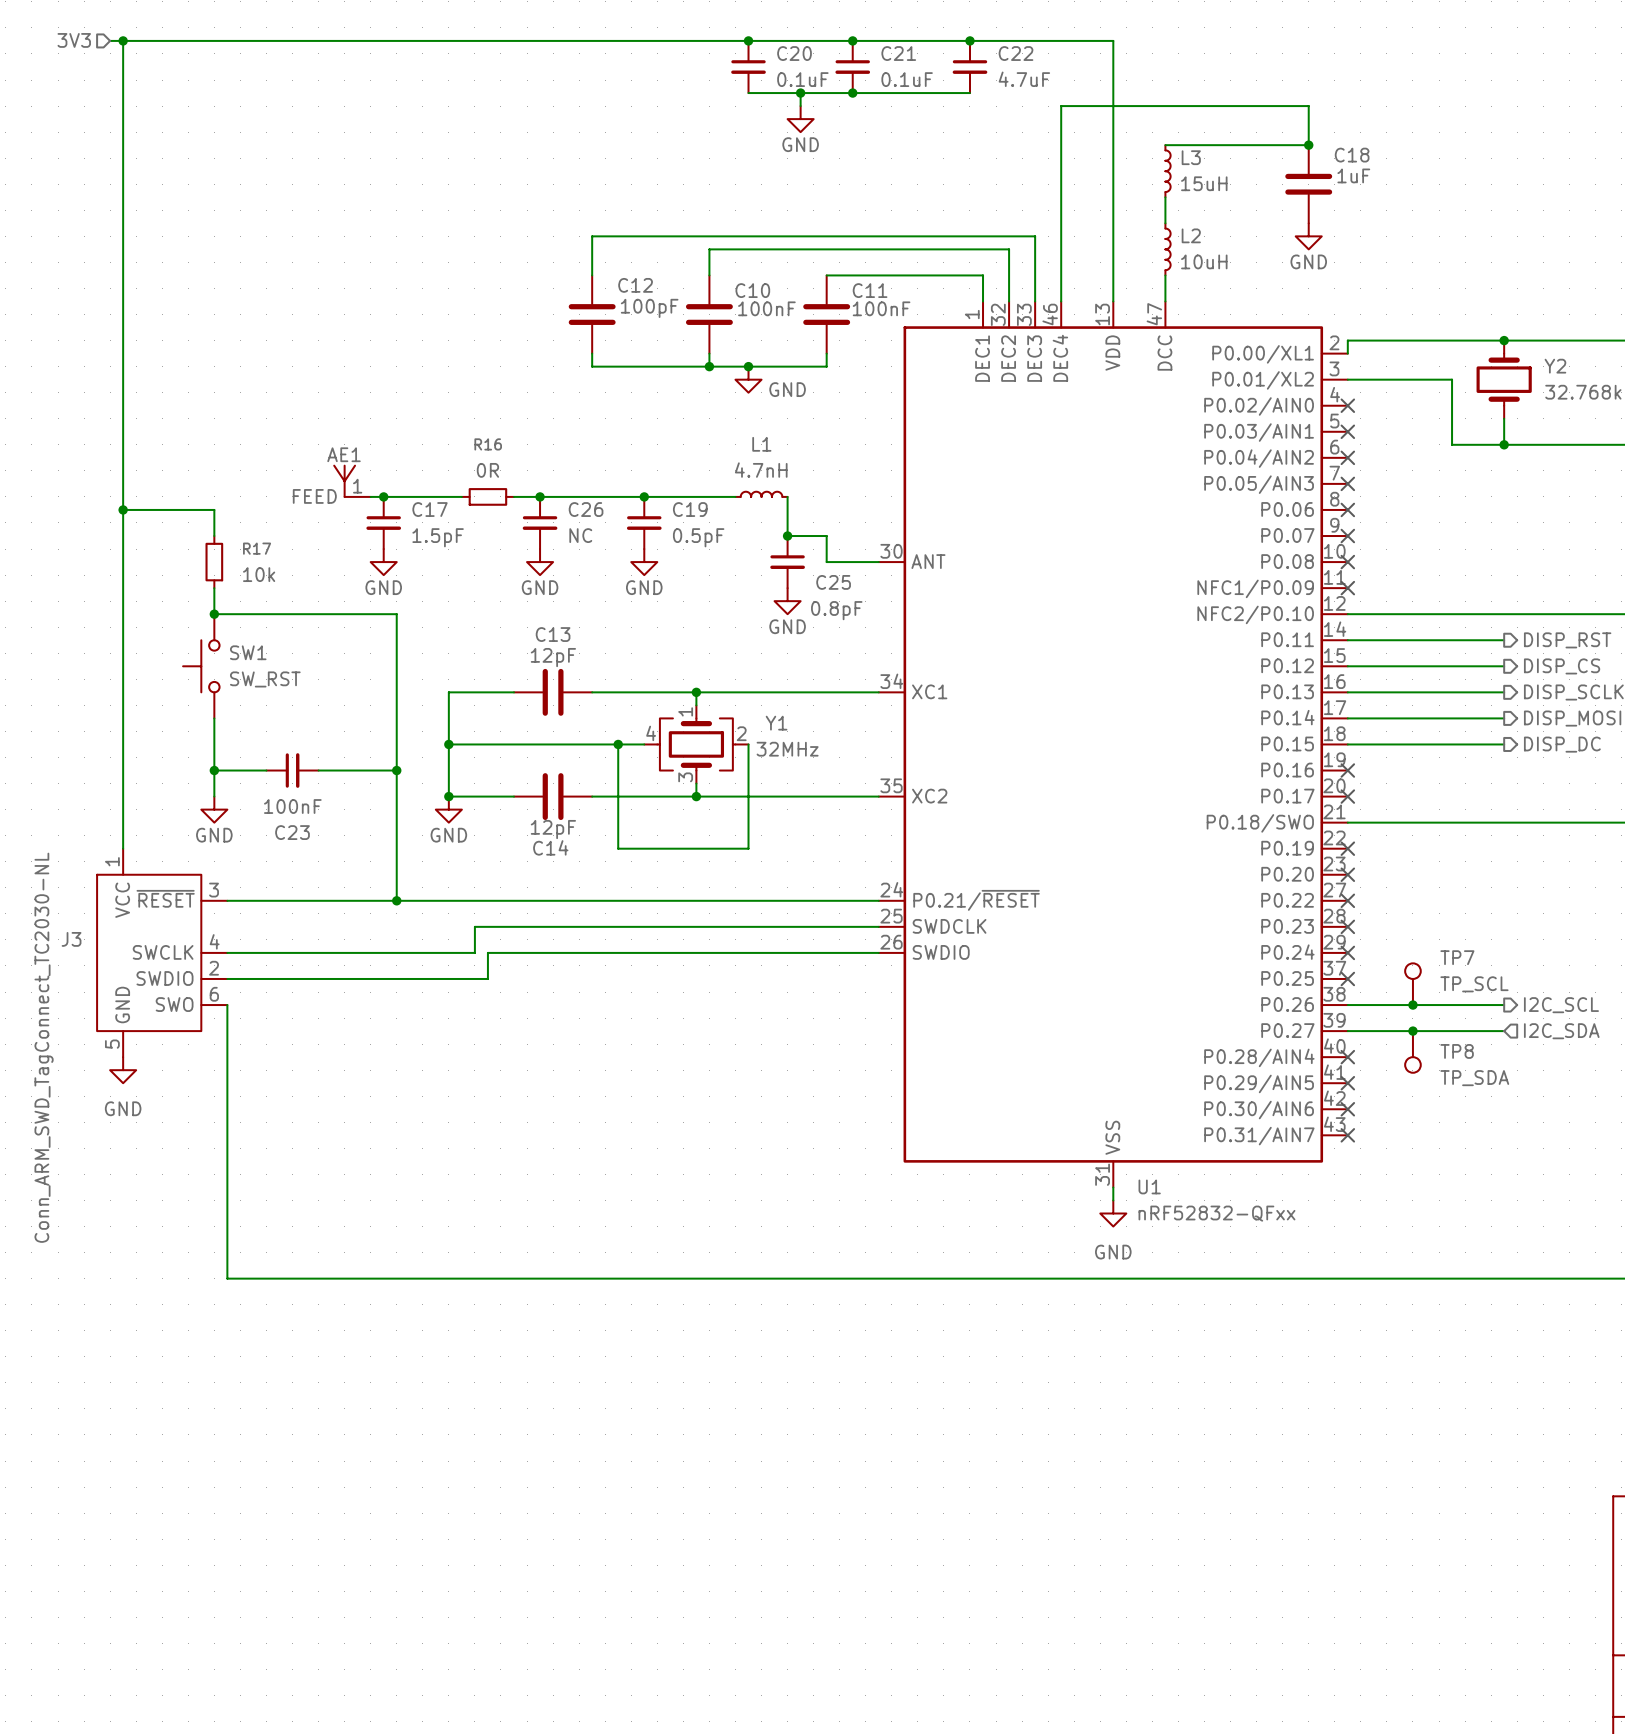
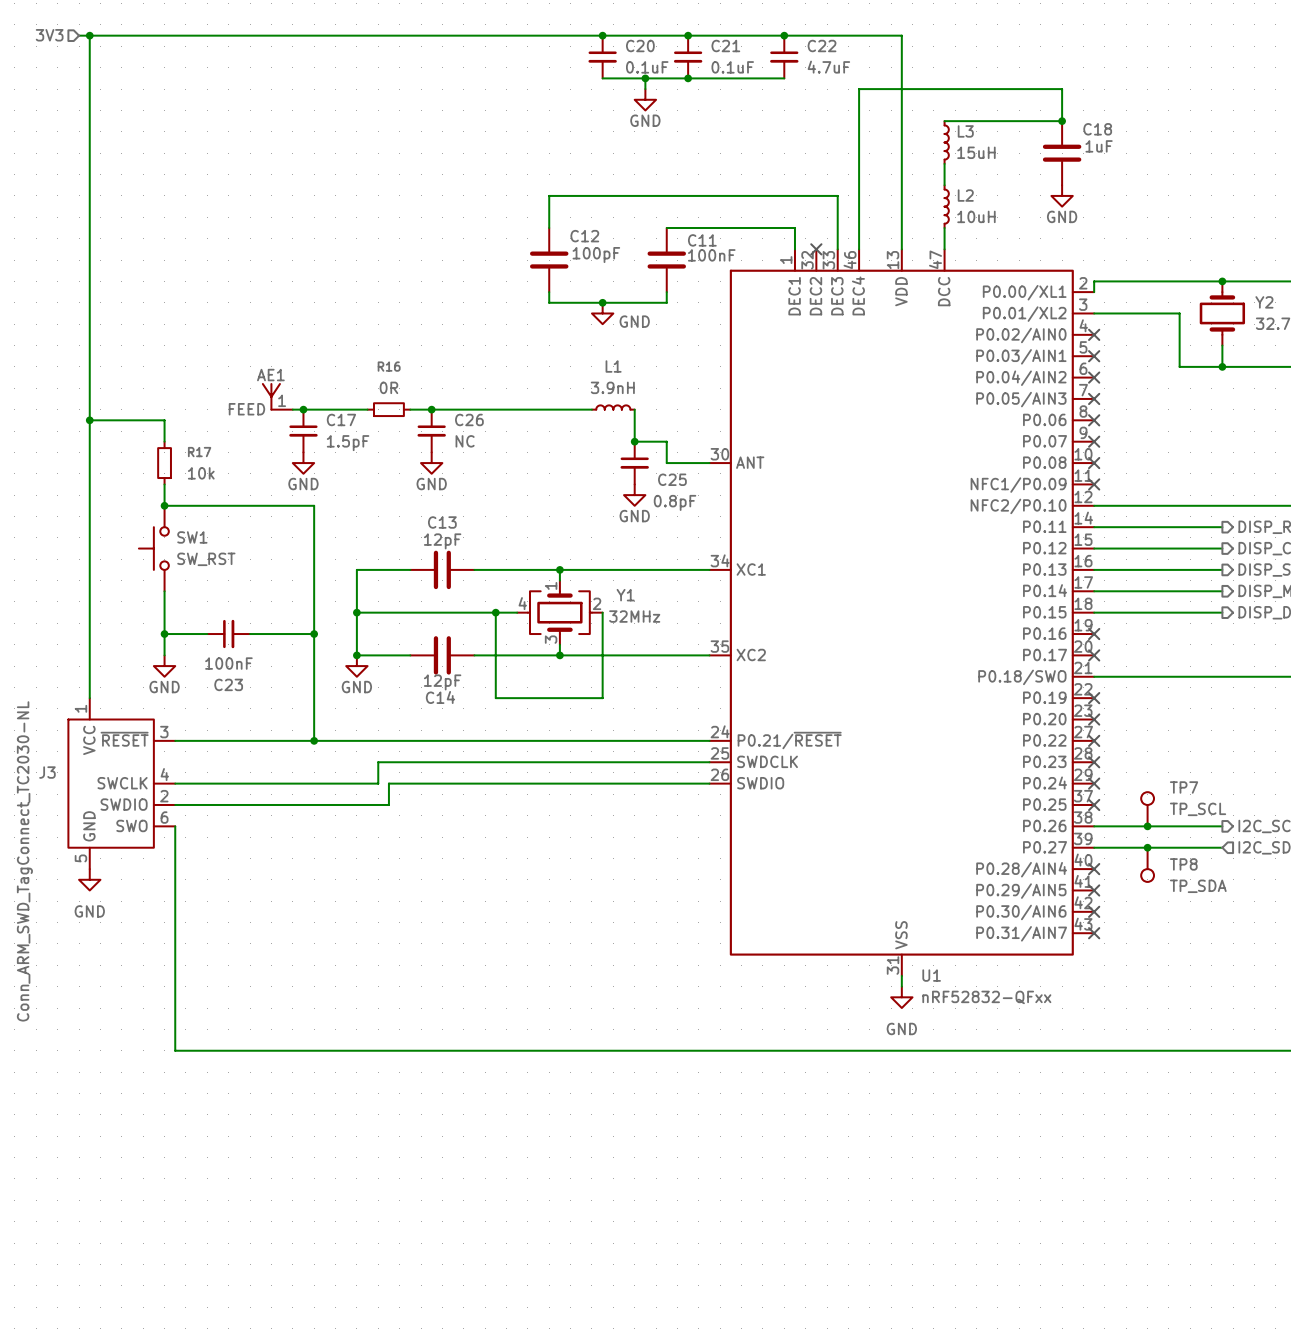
wire: (683, 236) (592, 236) (592, 275) -> (549, 195) (549, 227)
wire: (709, 275) (709, 249) (1009, 249) (1009, 301) -> none
no-connect mark: none -> (816, 249)
C12 position: (592, 314) -> (549, 260)
C10: 100nF (709, 314) -> none
wire: (592, 353) (592, 366) (683, 366) -> (549, 292) (549, 302)
wire: (709, 353) (709, 366) -> none
junction: (709, 366) -> none
L1 value: 4.7nH (761, 470) -> 3.9nH (612, 387)
junction: (644, 496) -> none
C19: 0.5pF (644, 522) -> none
power symbol: GND (644, 562) -> none

